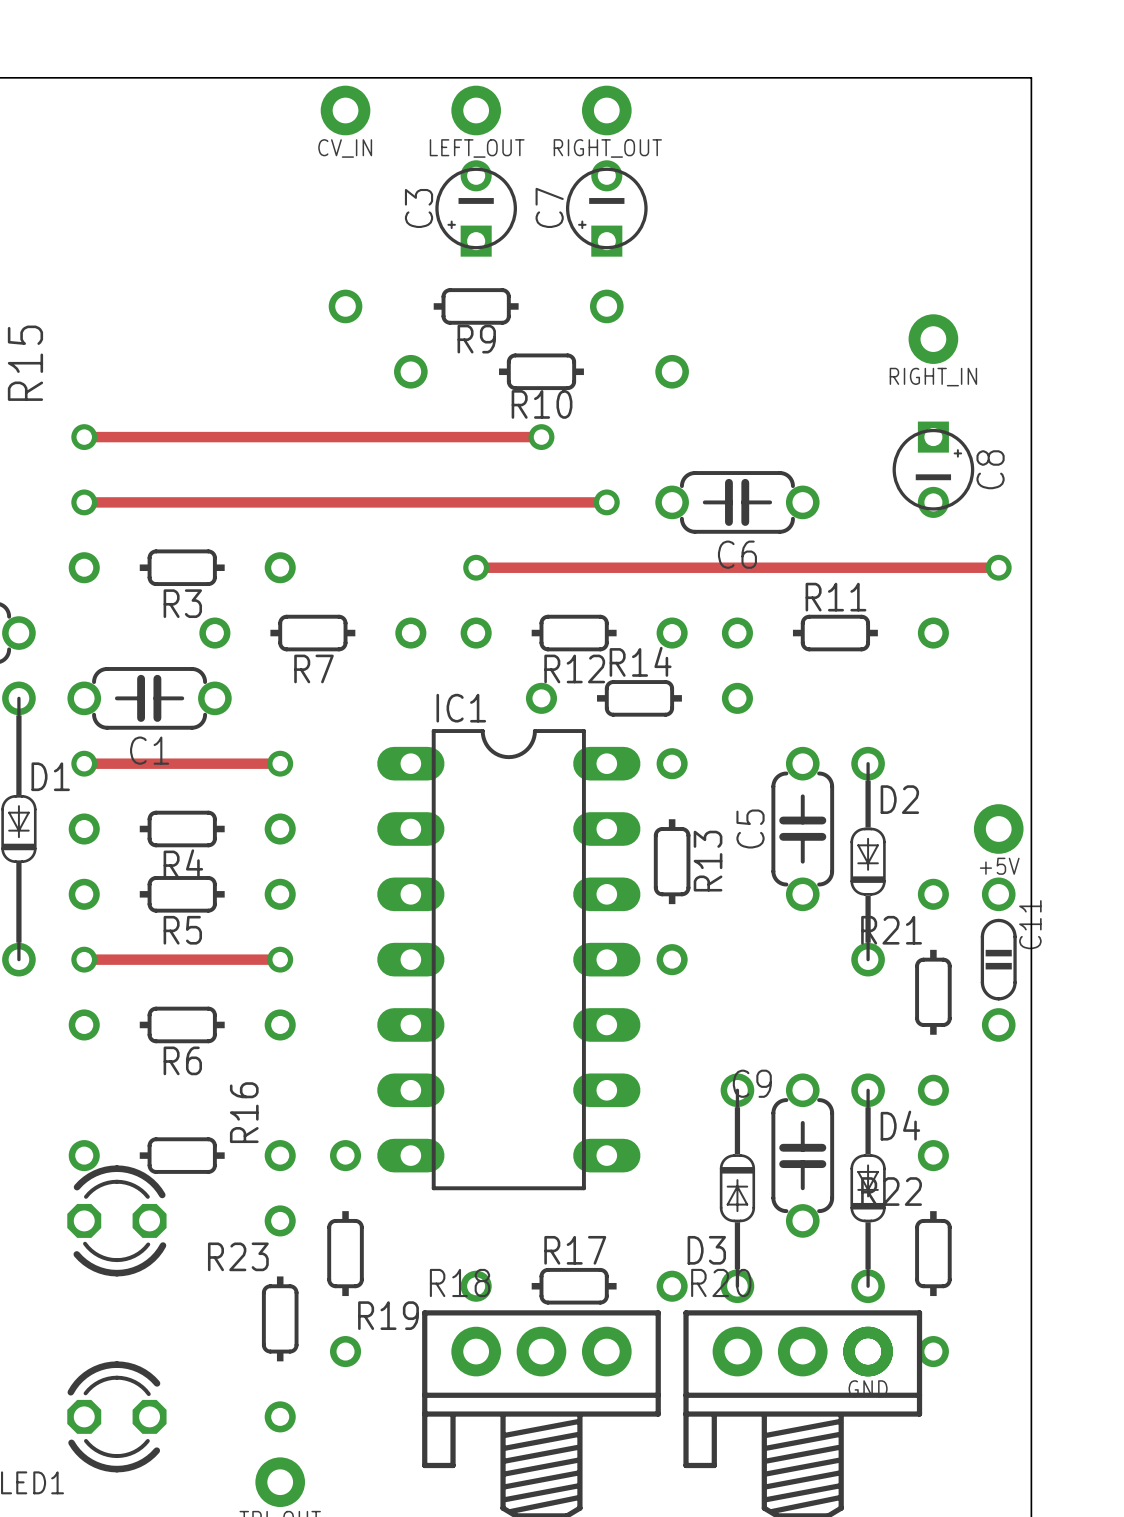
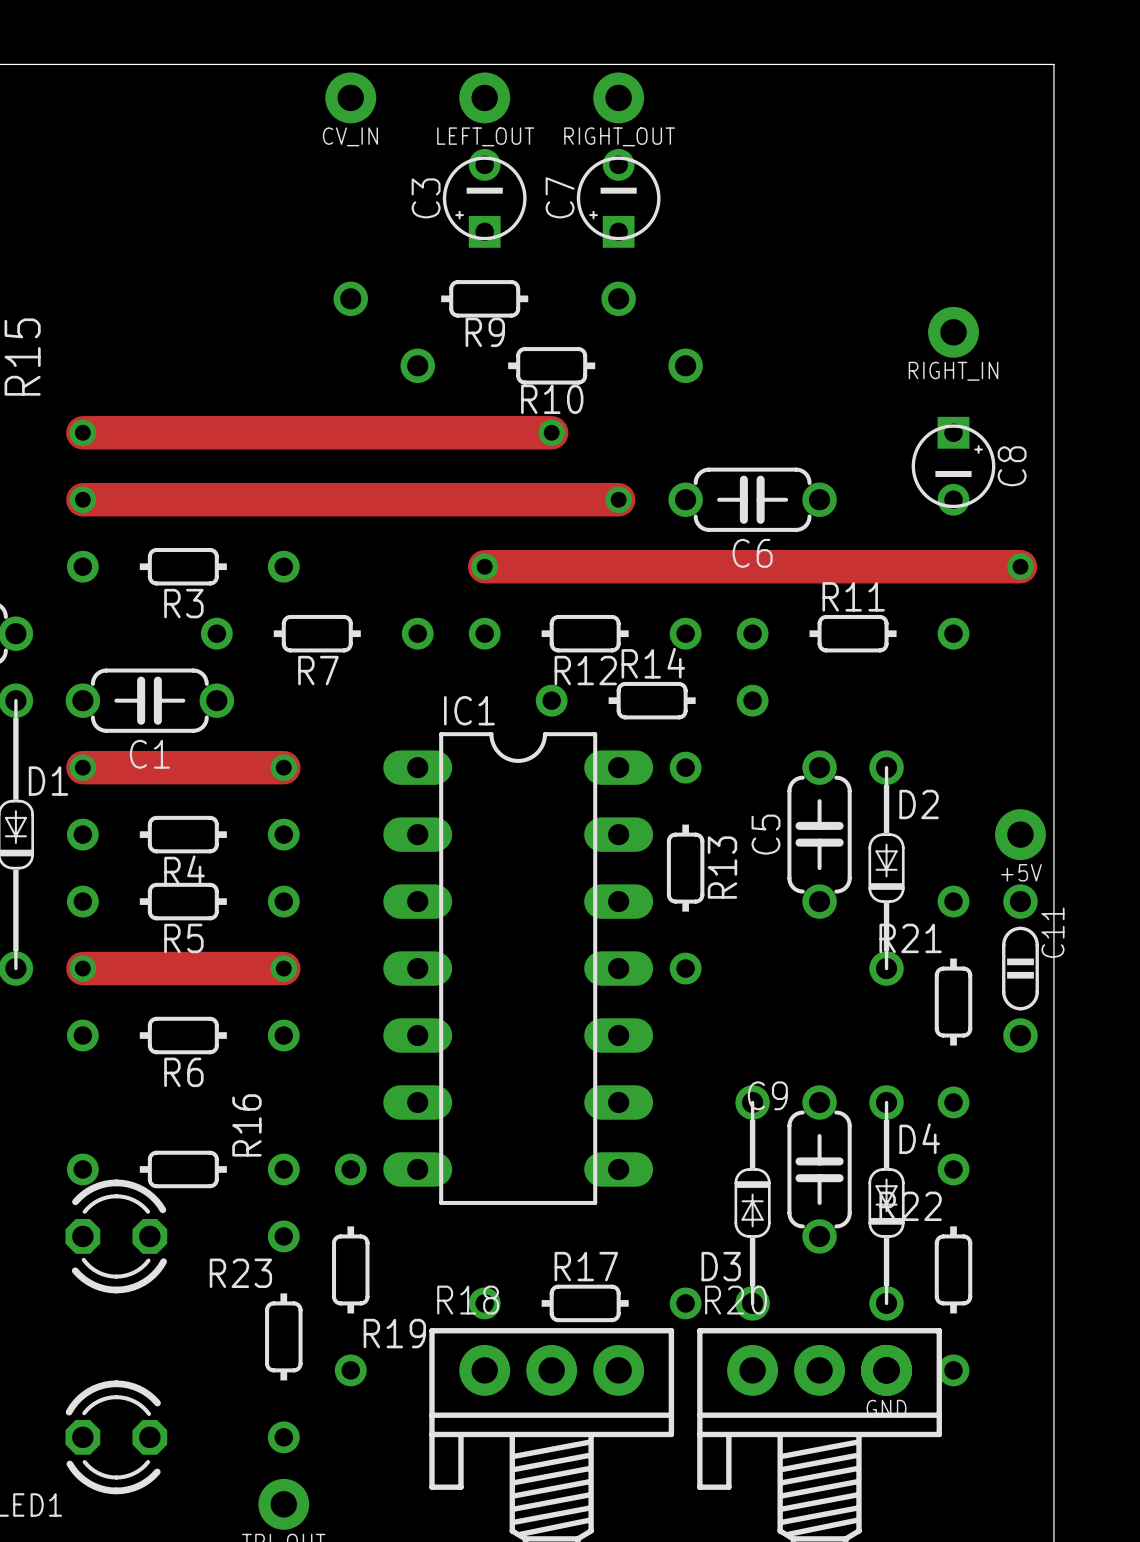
track width: thin (84, 437) (541, 437) -> thick (82, 432) (551, 432)
track width: thin (84, 502) (606, 502) -> thick (82, 499) (618, 499)
track width: thin (476, 567) (998, 567) -> thick (484, 566) (1020, 566)
track width: thin (84, 763) (280, 763) -> thick (82, 767) (283, 767)
track width: thin (84, 959) (280, 959) -> thick (82, 968) (283, 968)

